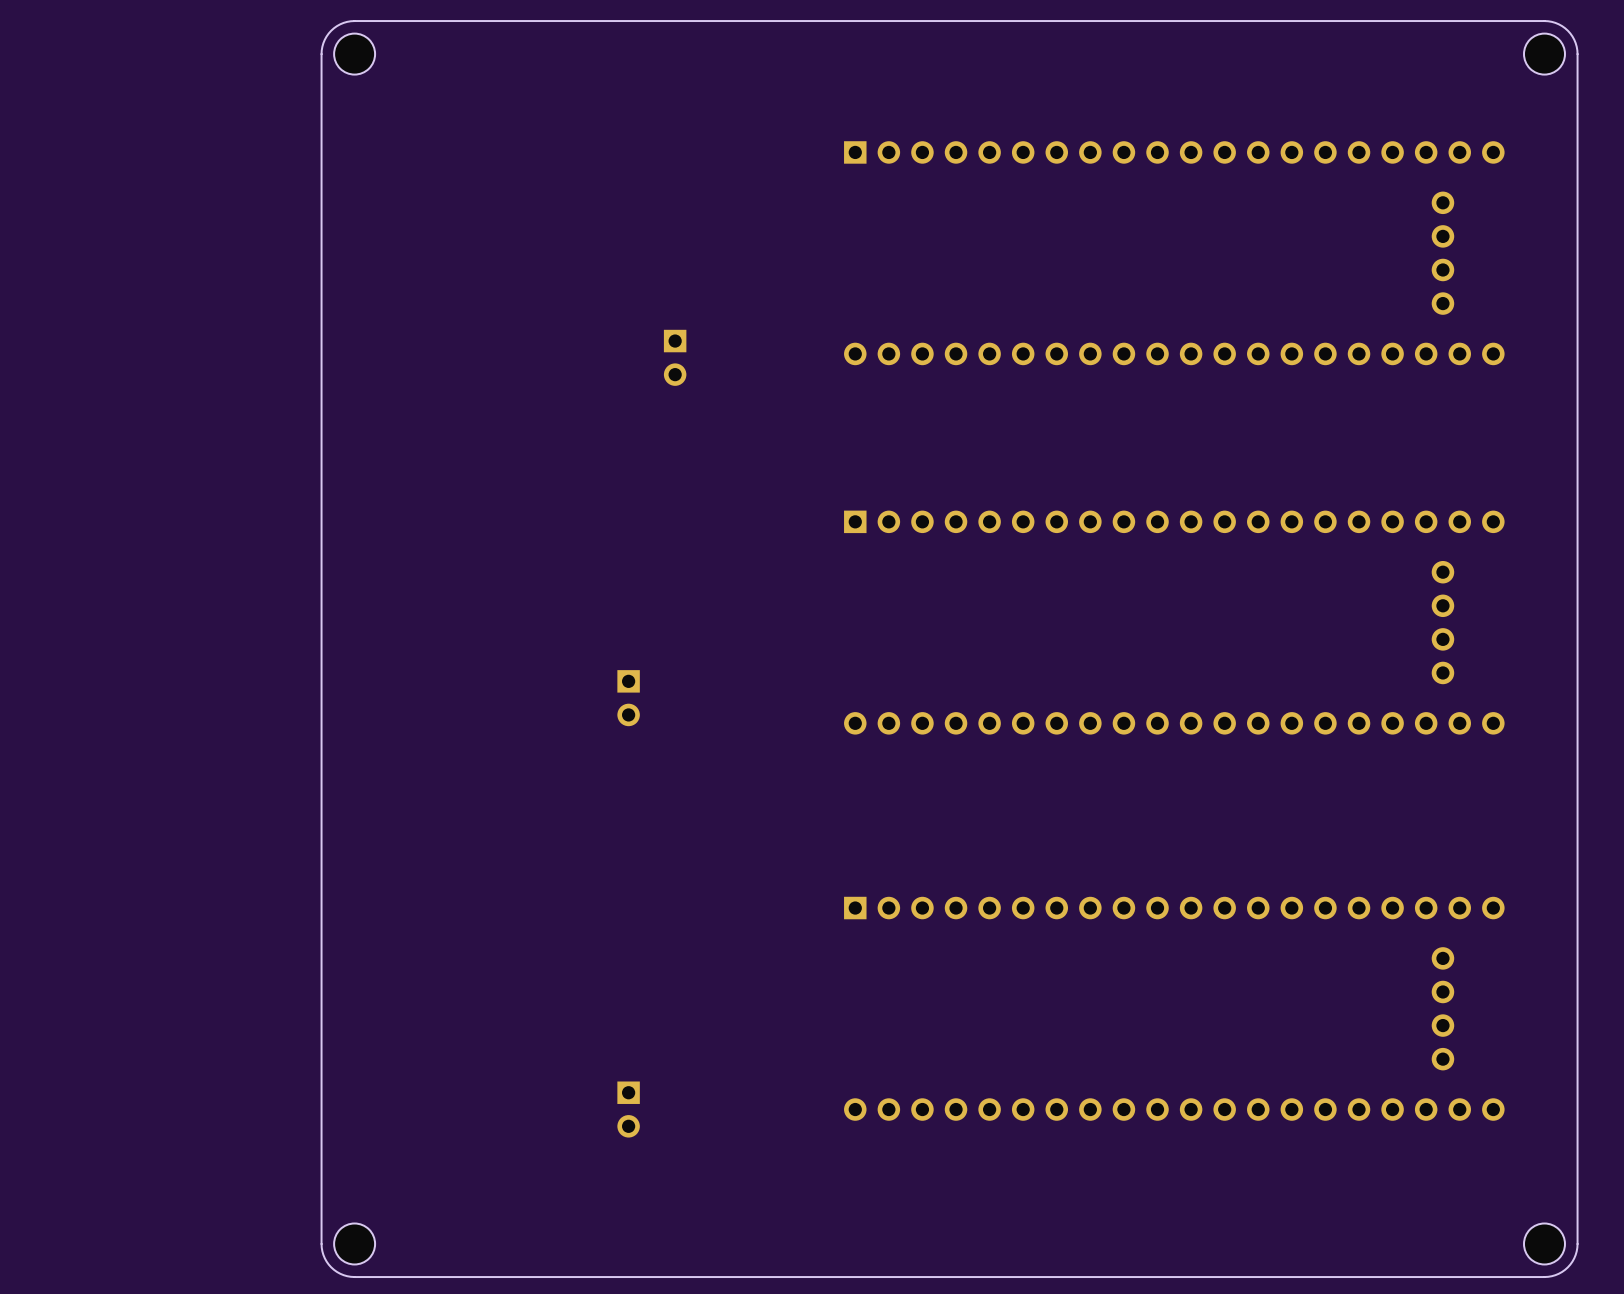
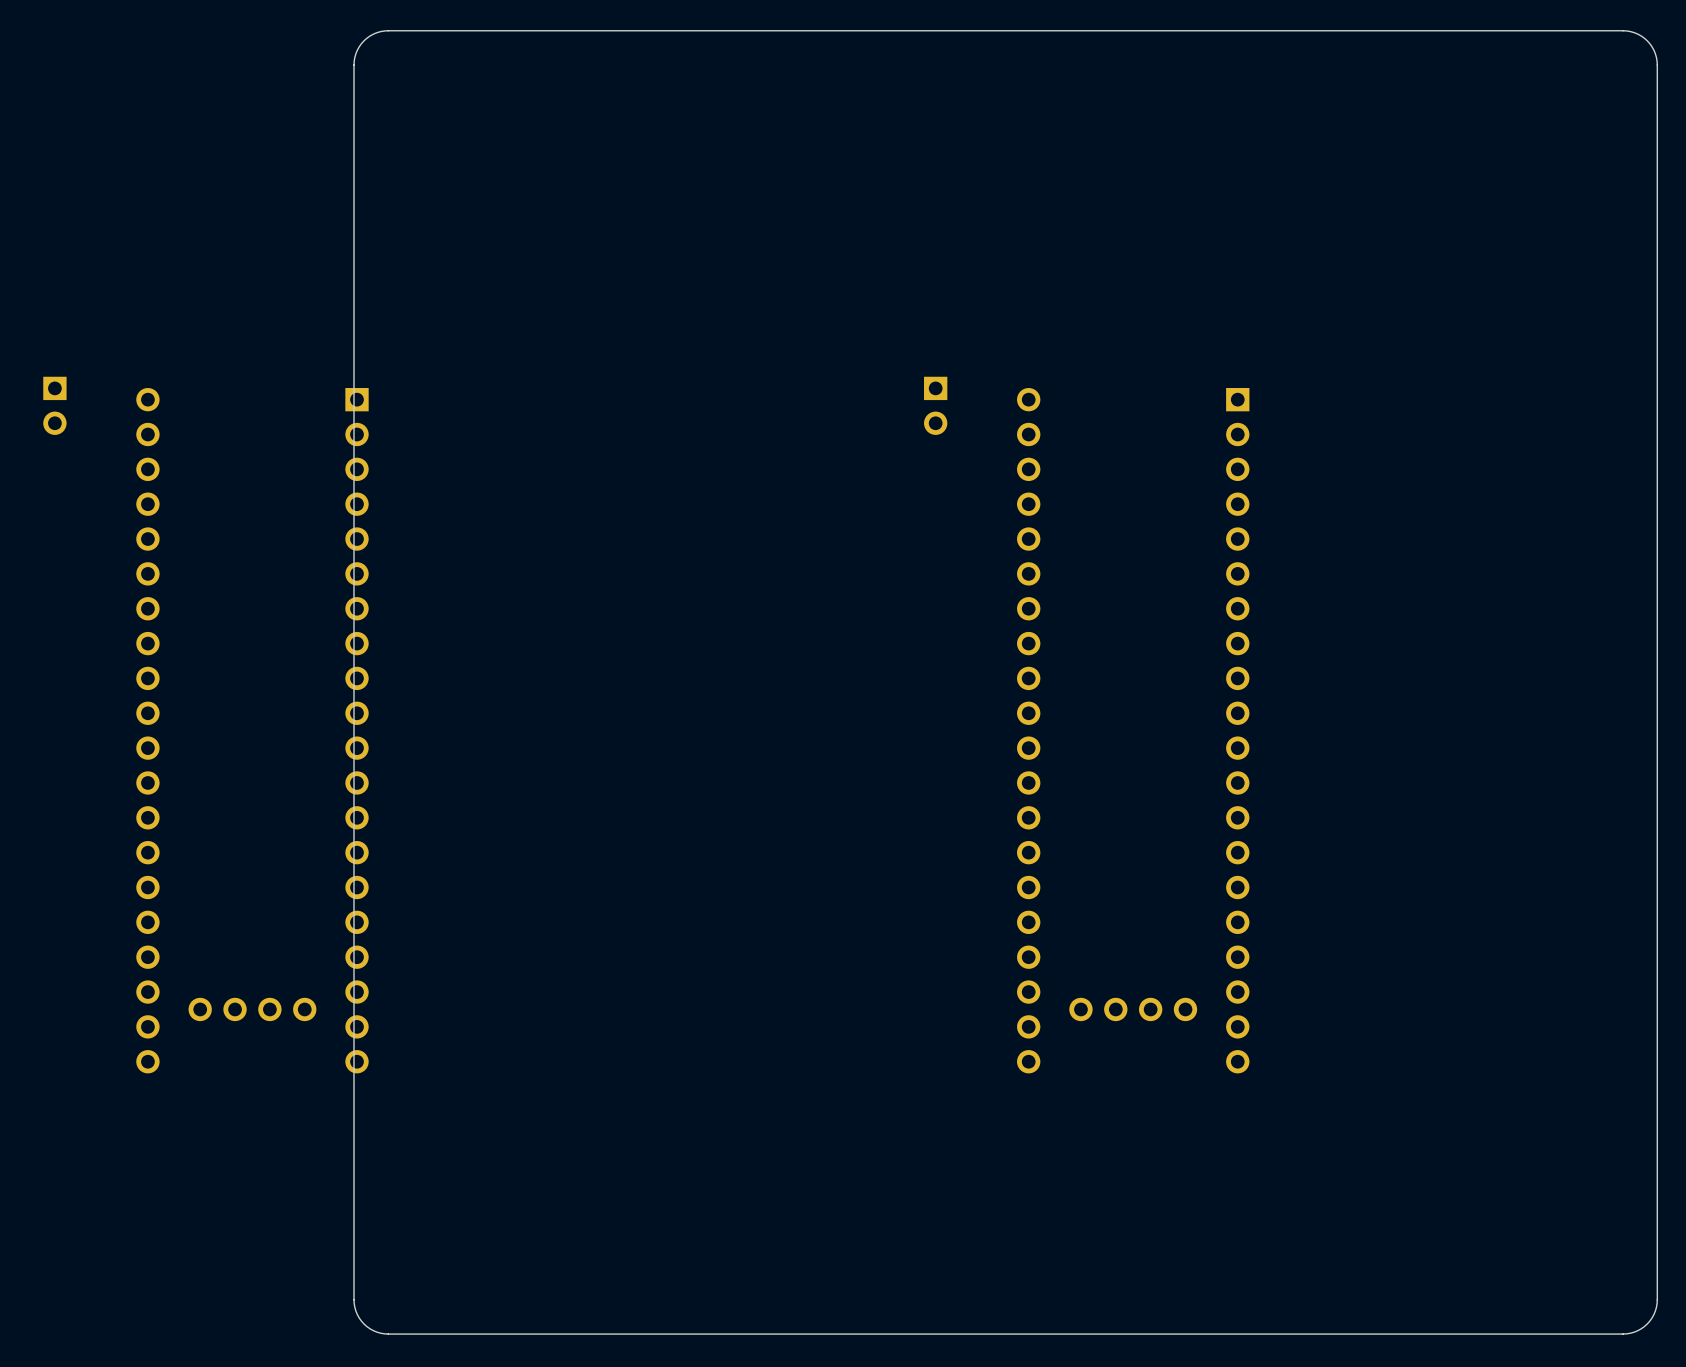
part: (354, 54) -> none
part: (1544, 54) -> none
part: (1174, 253) -> none
part: (675, 357) -> none
part: none -> (54, 405)
part: none -> (935, 405)
part rotation: 0° (1174, 622) -> 90° clockwise (1133, 730)
part: none -> (252, 730)
part: (628, 698) -> none
part: (1174, 1008) -> none
part: (628, 1109) -> none
part: (354, 1243) -> none
part: (1544, 1243) -> none

